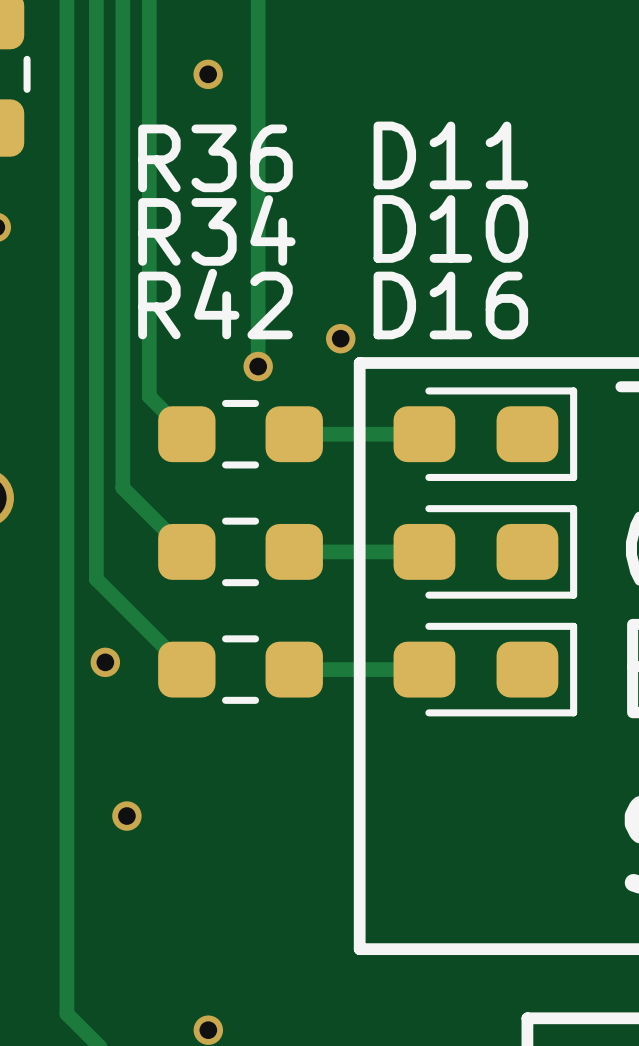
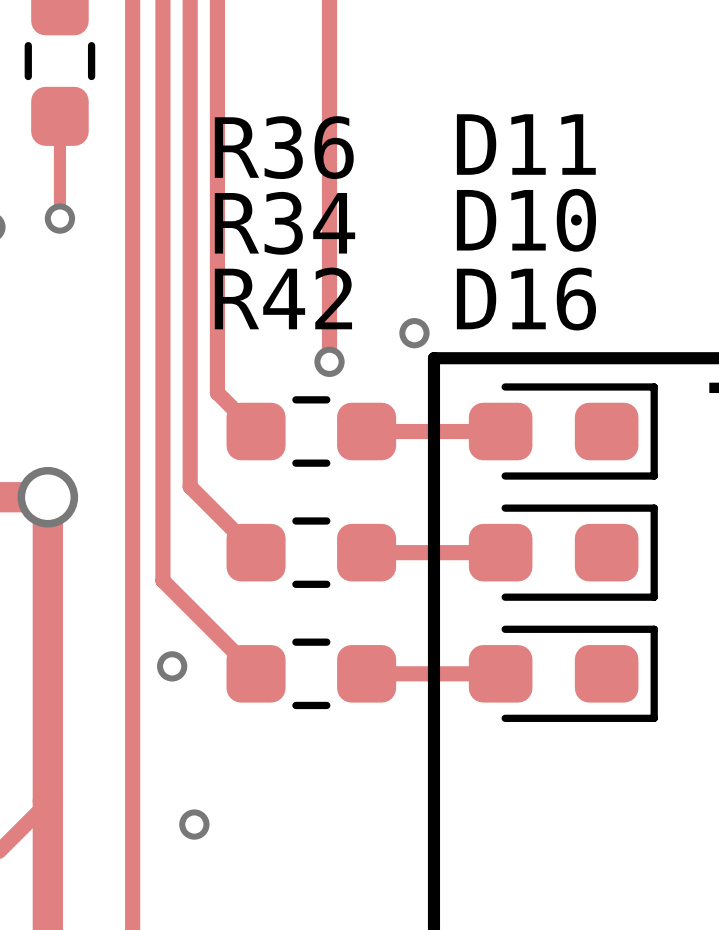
via: (208, 74) -> none

